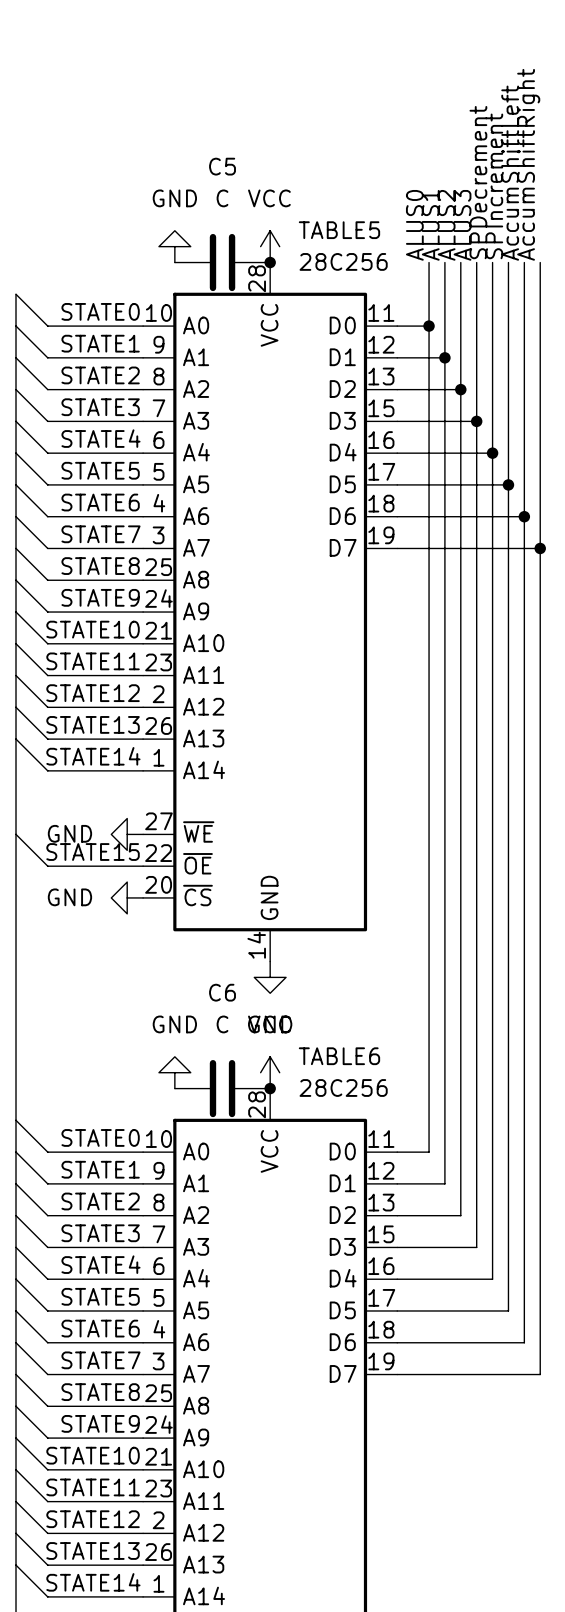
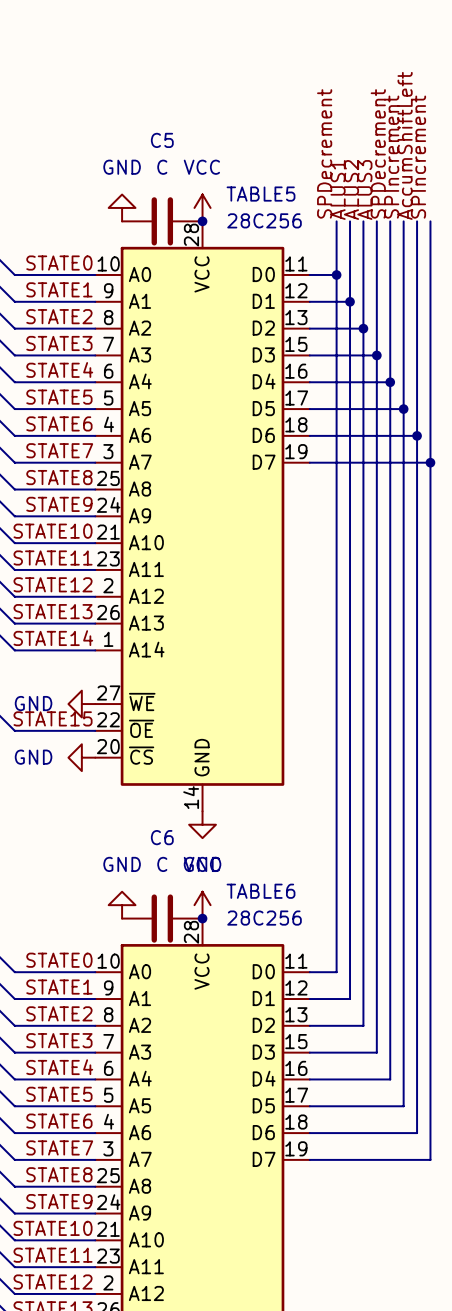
label: AccumShiftRight (528, 164) -> SPIncrement (418, 157)
label: ALUS0 (414, 225) -> SPDecrement (324, 153)

